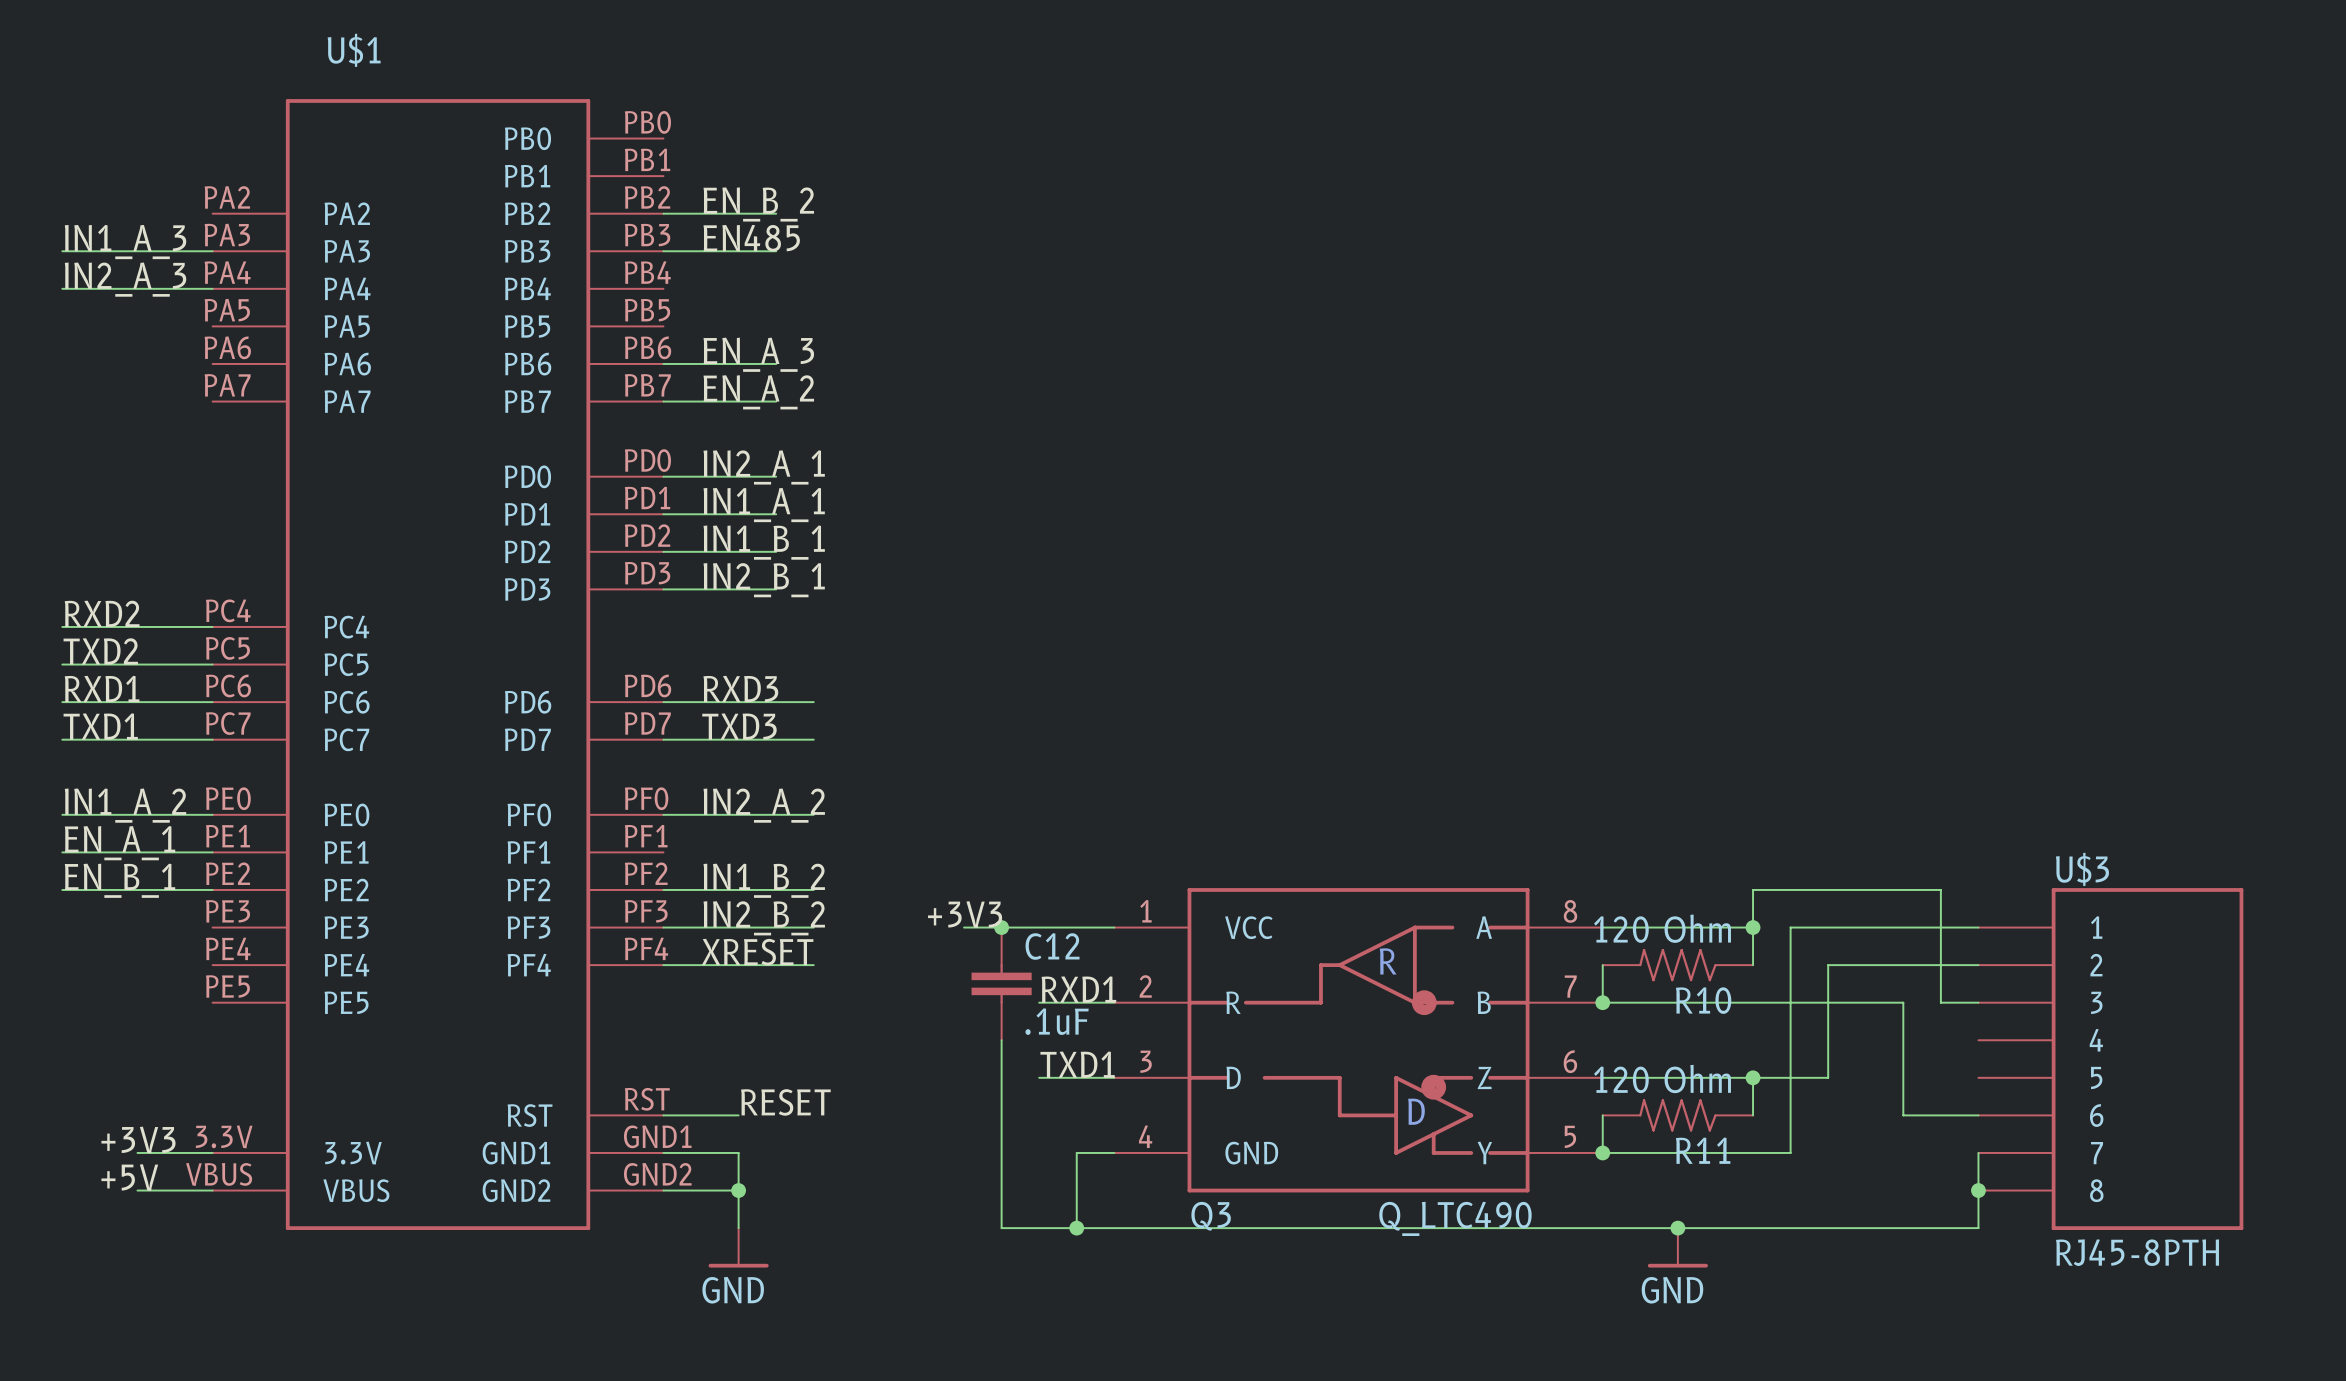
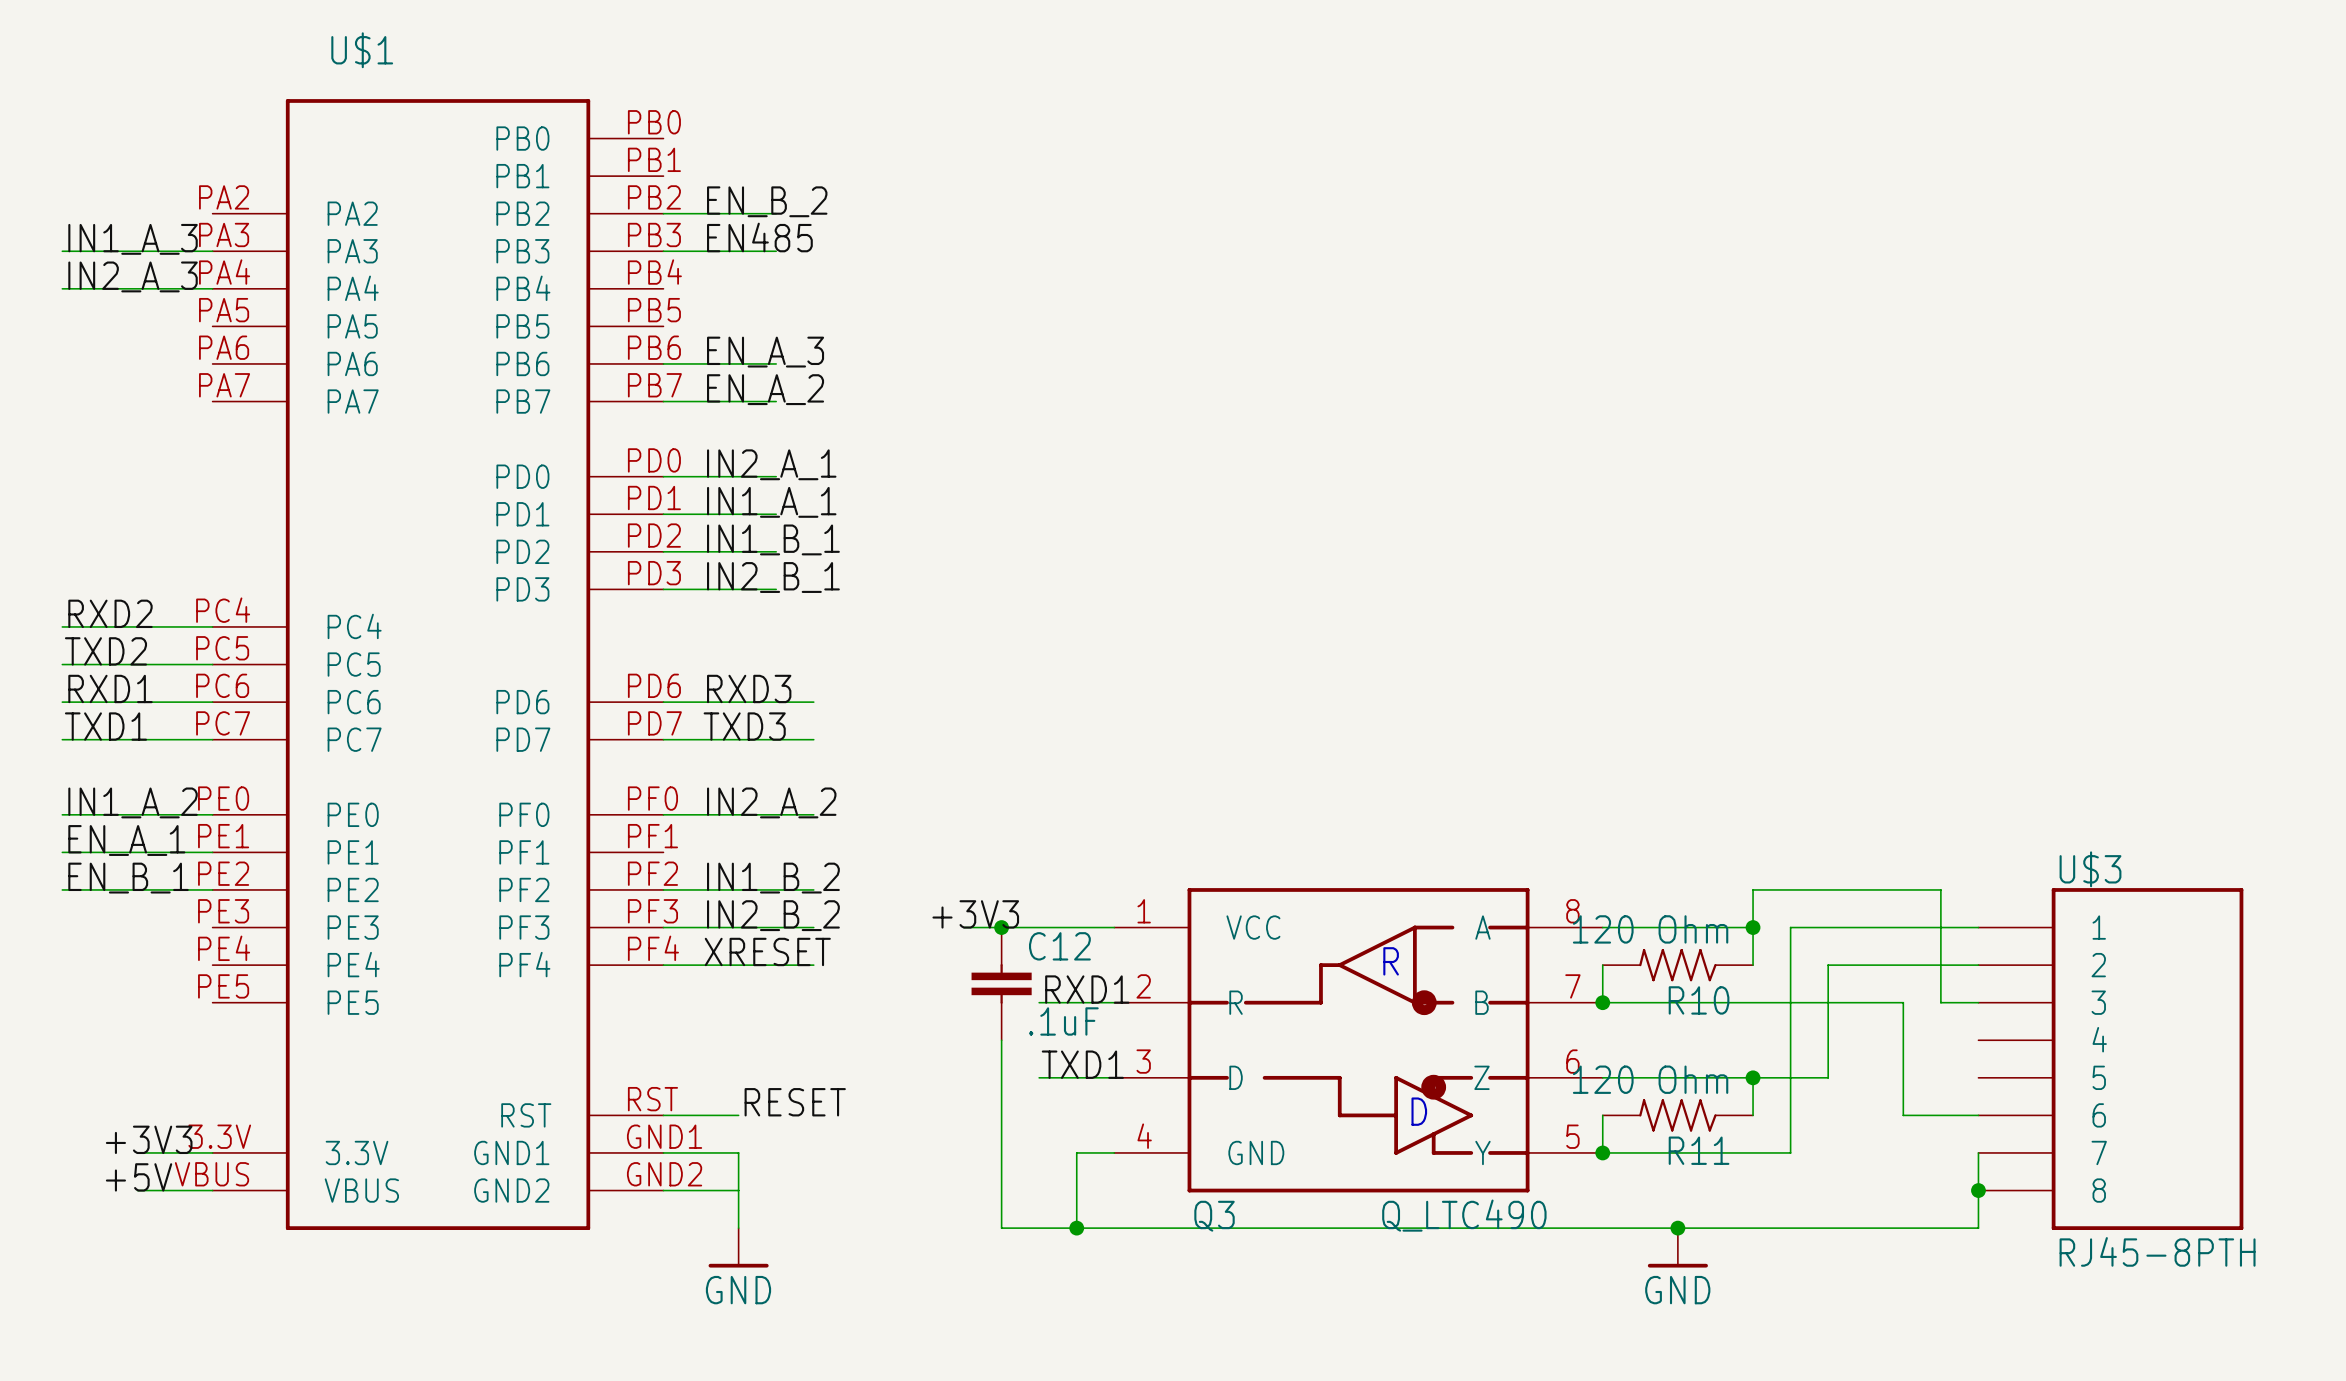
junction: (738, 1190) -> none

